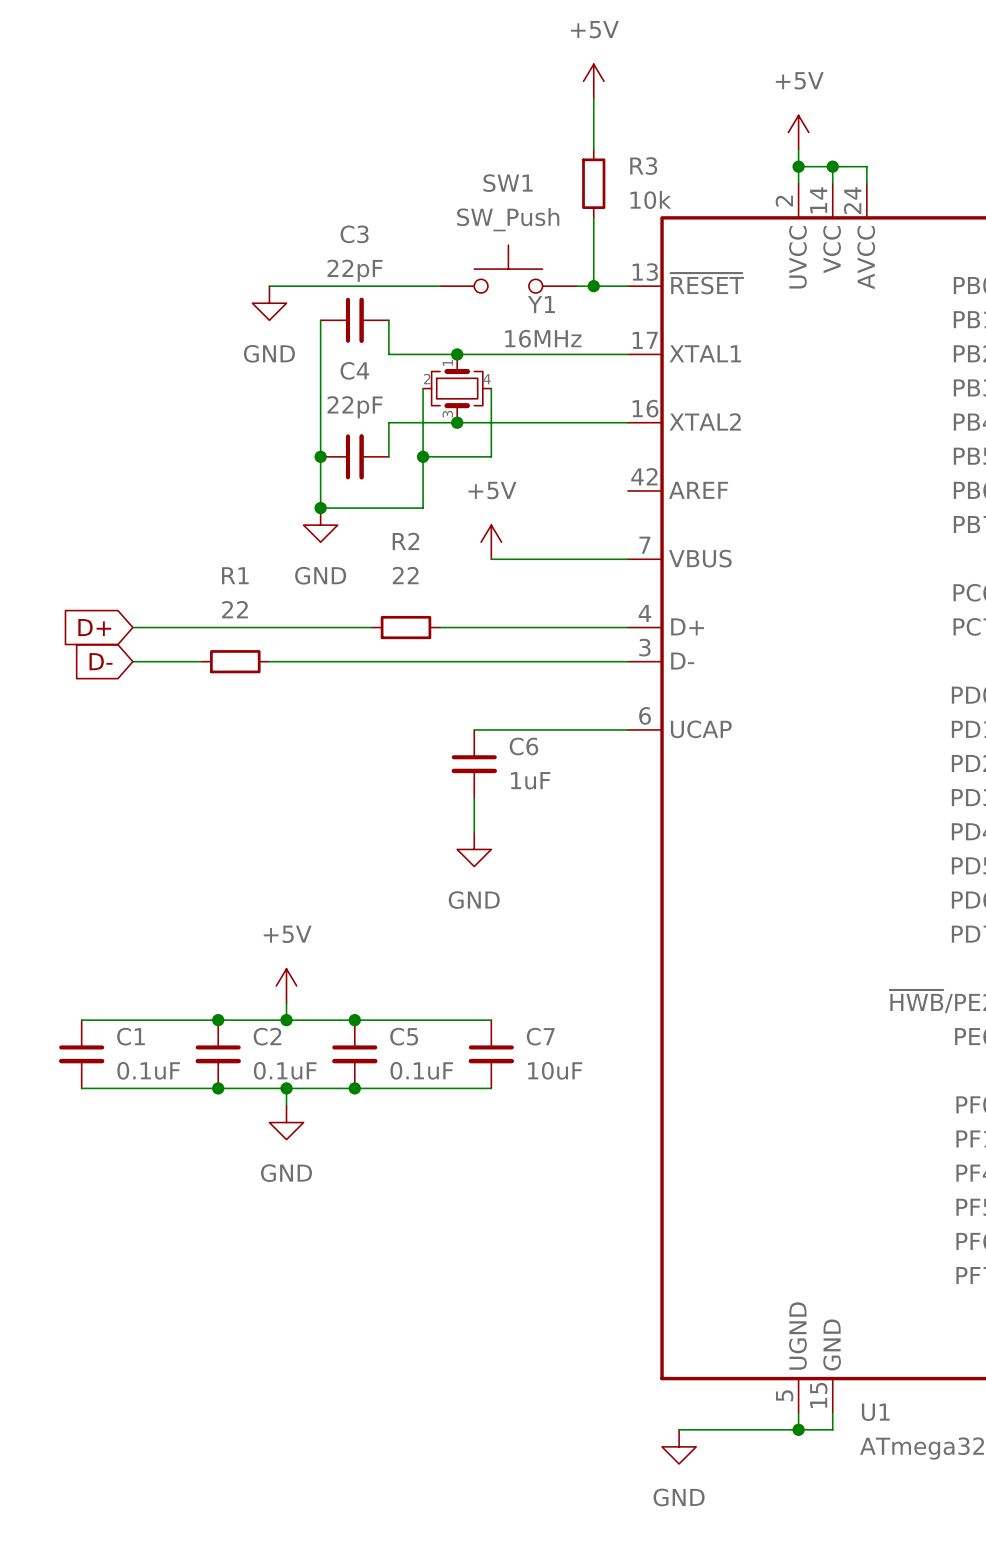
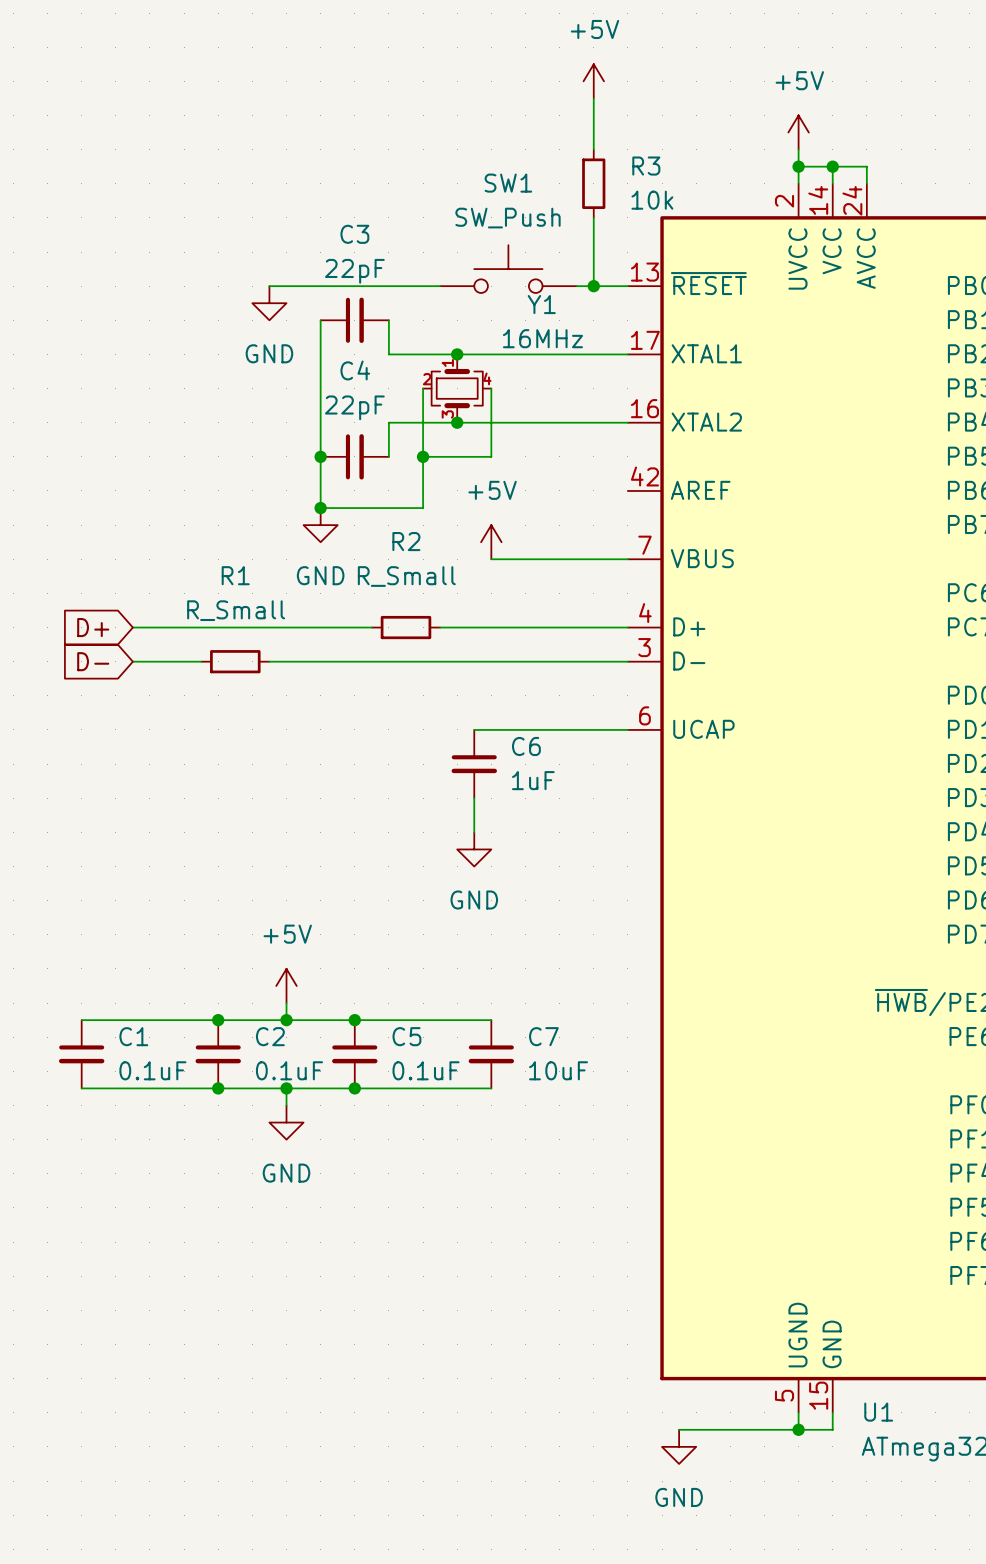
R2 value: 22 (405, 575) -> R_Small (406, 576)
R1 value: 22 (234, 609) -> R_Small (236, 610)

